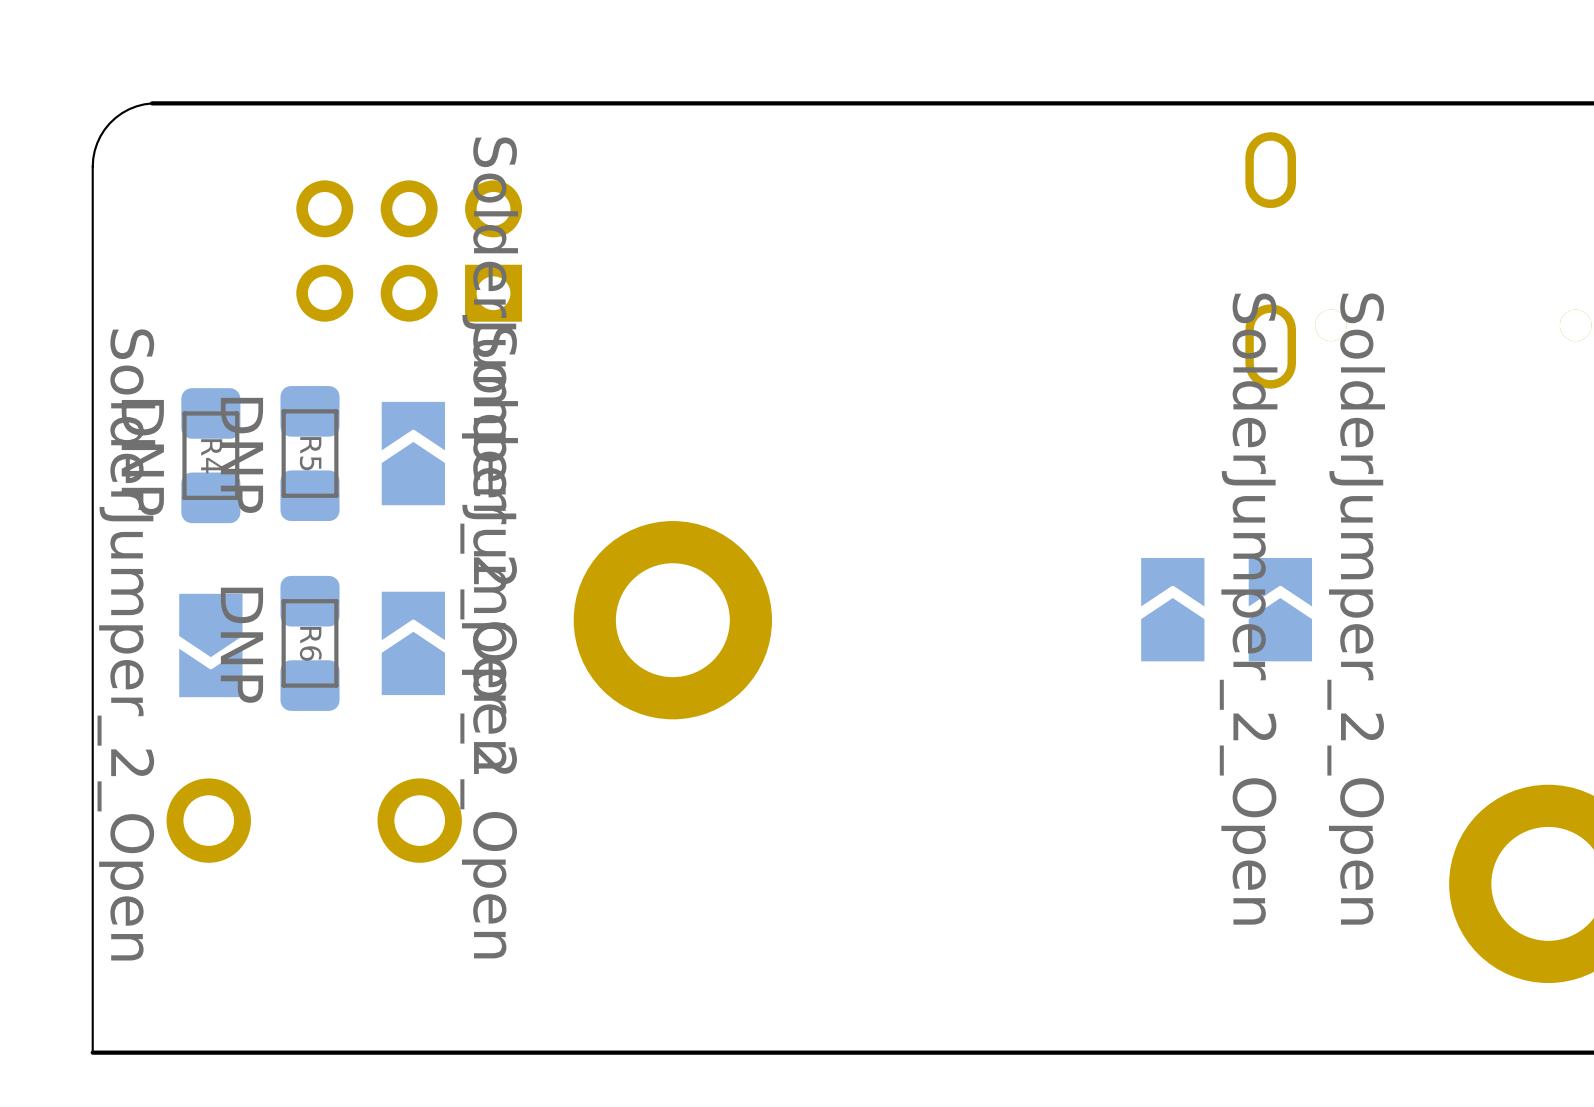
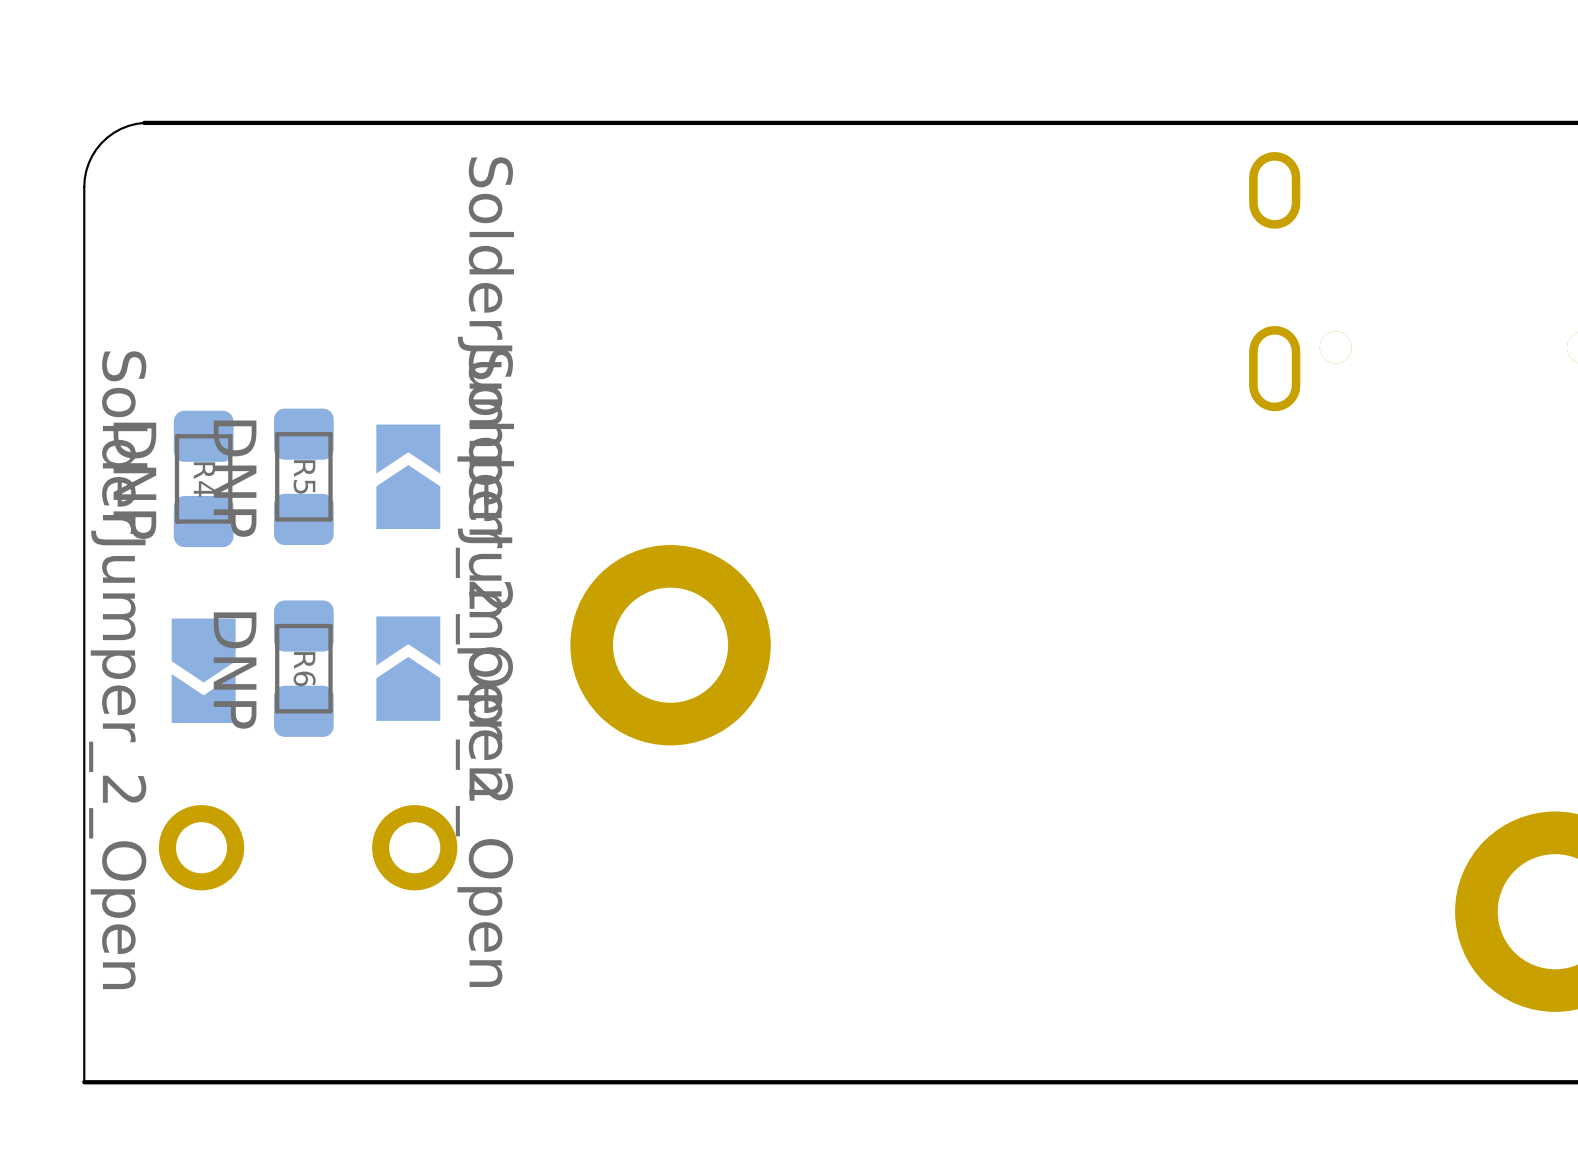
part: (409, 251) -> none
part: SolderJumper_2_Open (1172, 609) -> none
part: SolderJumper_2_Open (1280, 609) -> none

